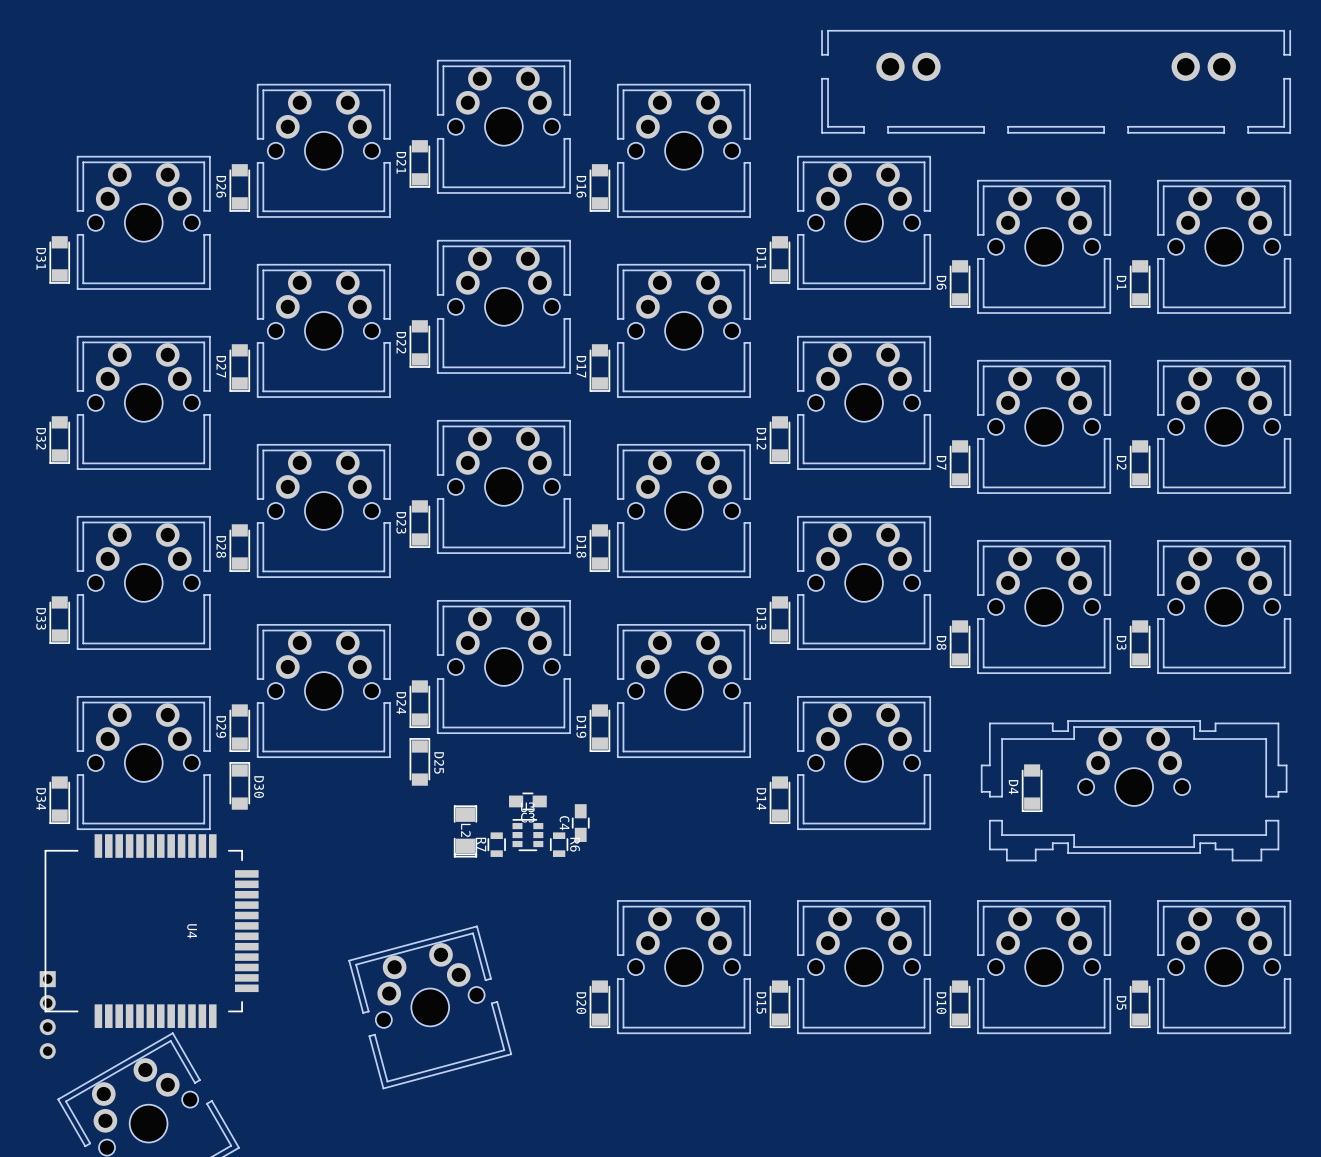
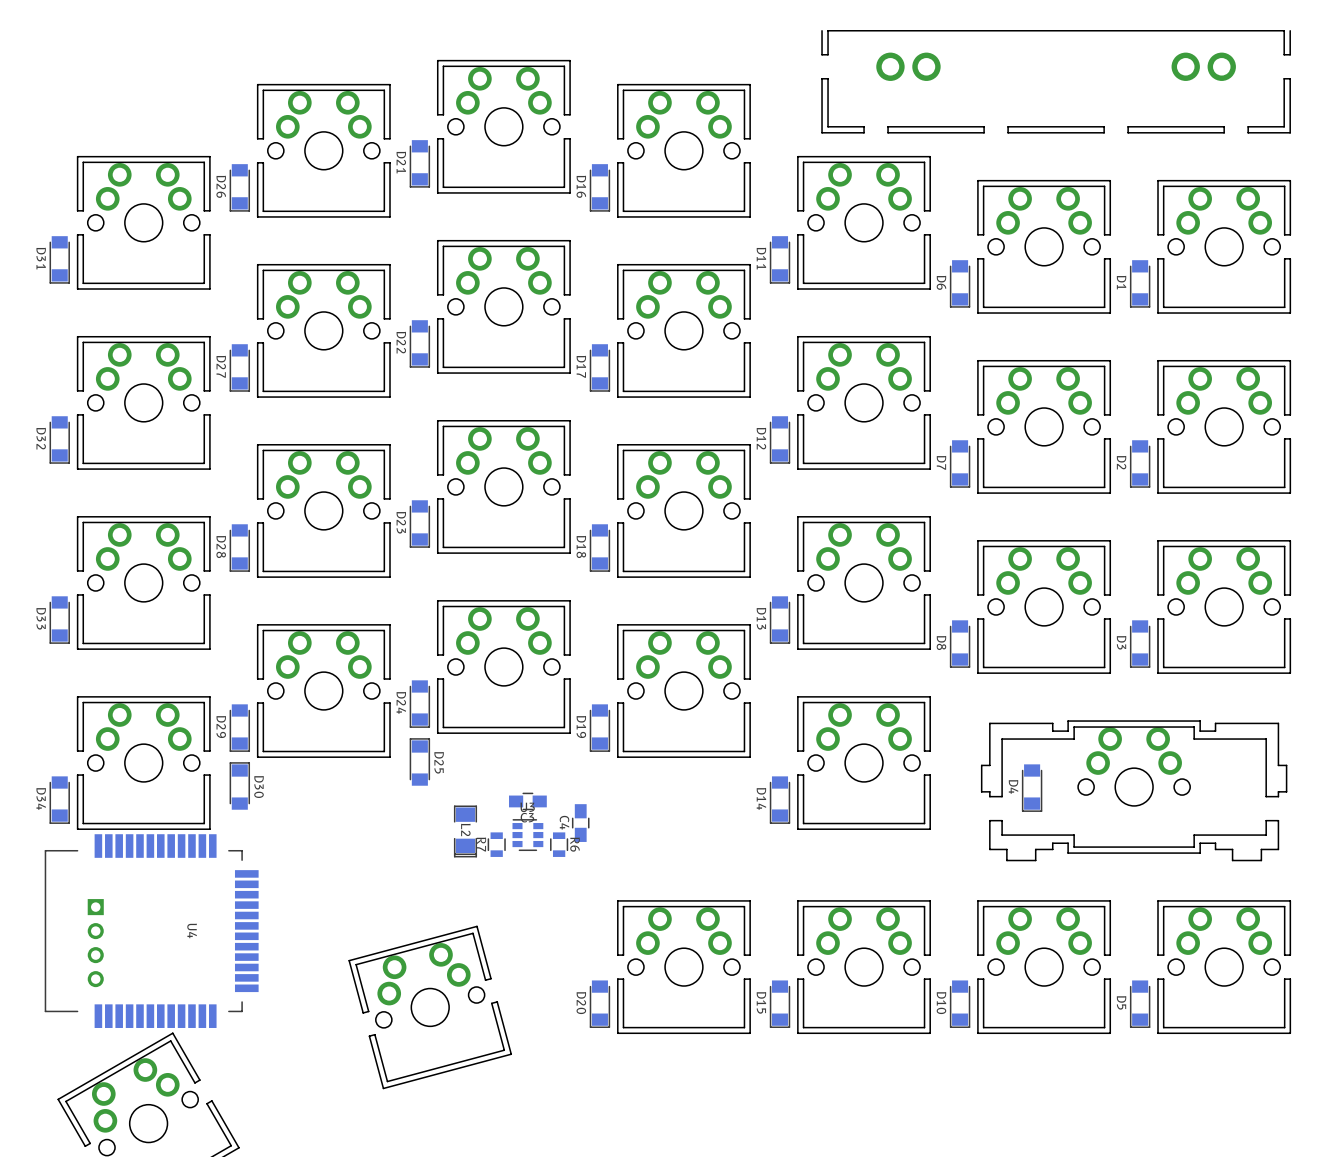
part position: (47, 1015) -> (95, 943)

